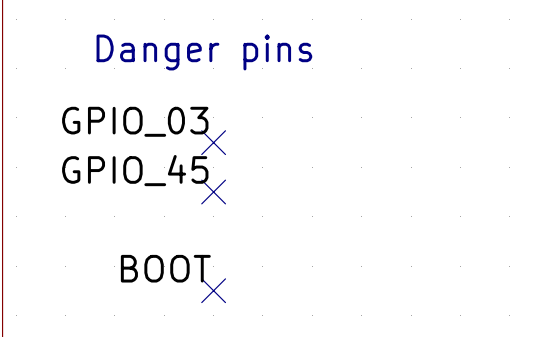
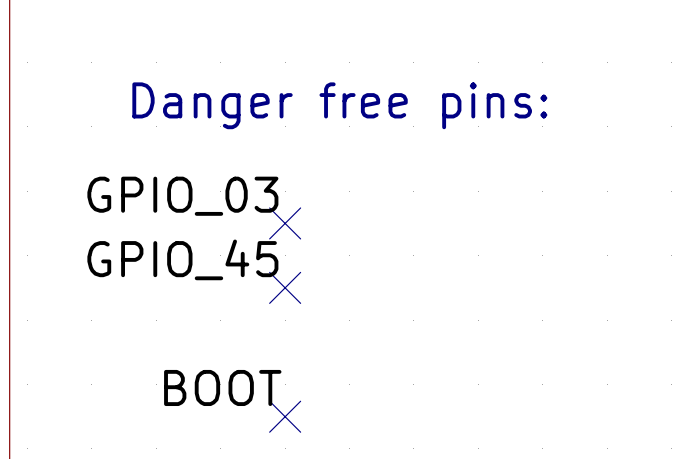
text: Danger pins (204, 52) -> Danger free pins: (339, 105)

